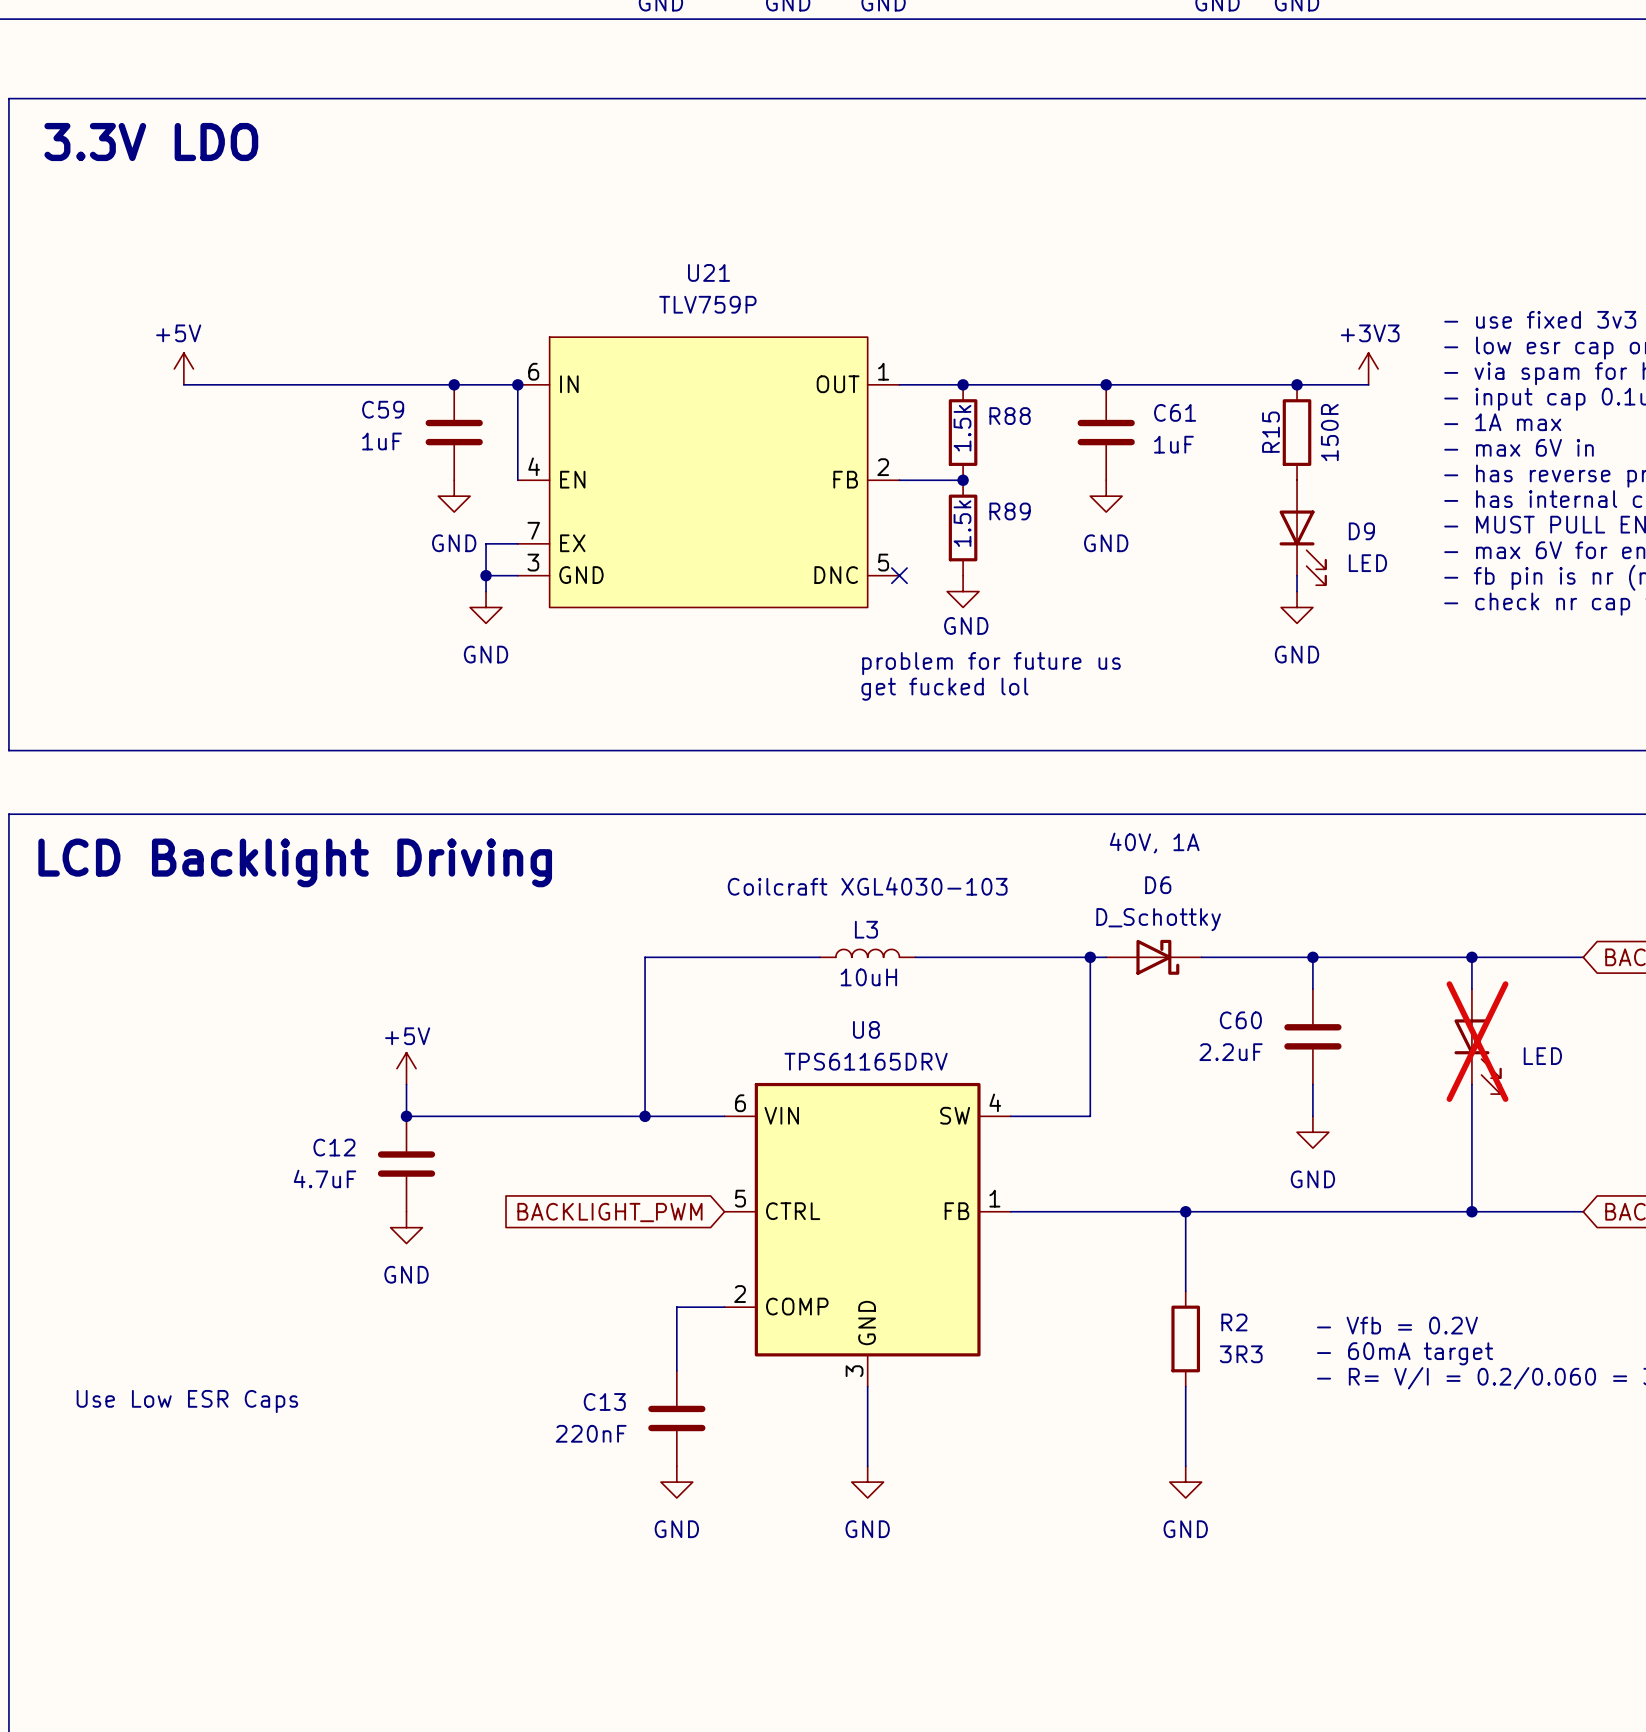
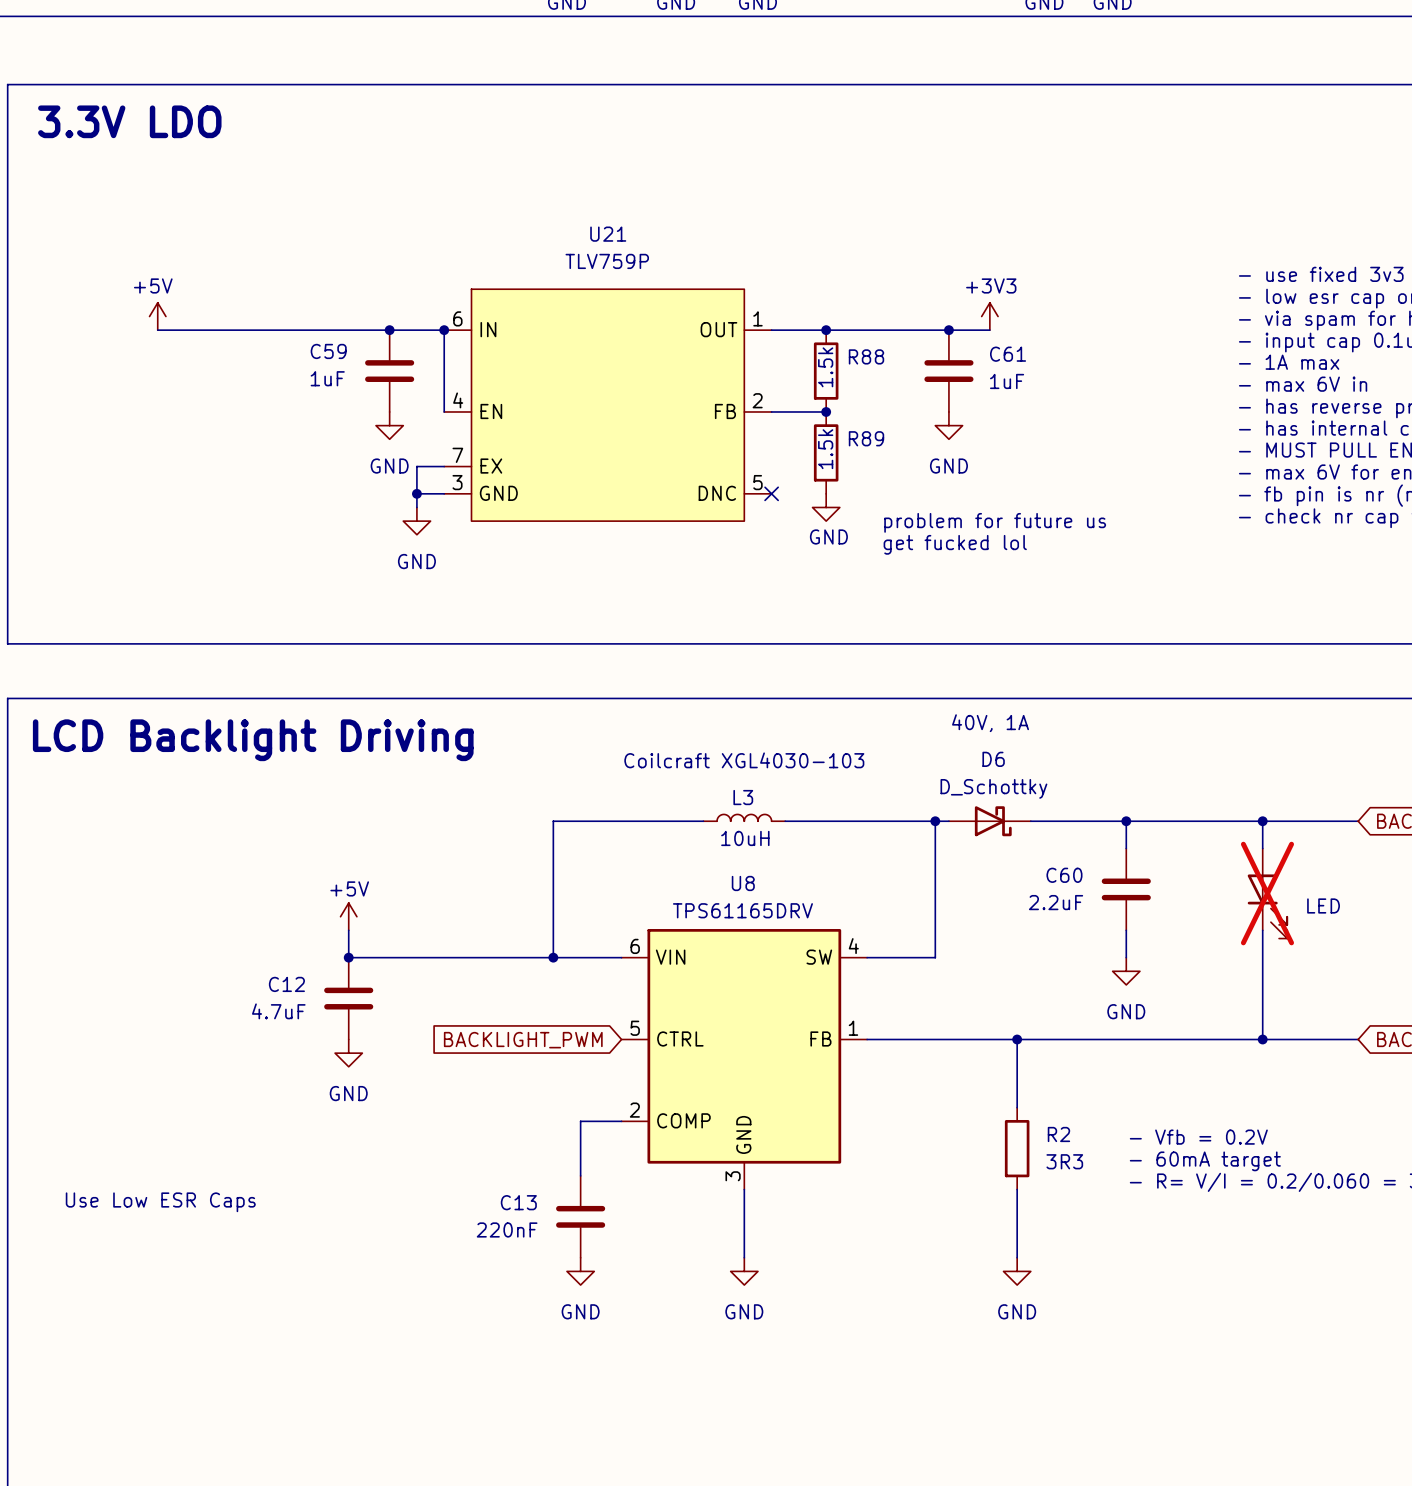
power symbol position: +3V3 (1368, 368) -> +3V3 (989, 316)
wire: (1153, 384) (1368, 384) -> none
junction: (1297, 384) -> none
R15: 150R (1297, 432) -> none
D9: LED (1302, 532) -> none
wire: (1297, 575) (1297, 591) -> none
power symbol: GND (1297, 607) -> none
text position: problem for future us (991, 663) -> problem for future us (995, 522)
text position: get fucked lol (944, 689) -> get fucked lol (955, 544)

